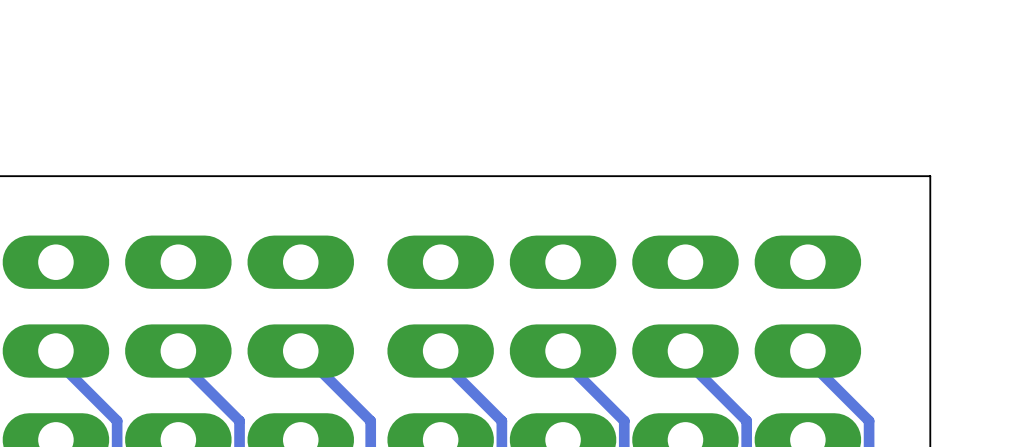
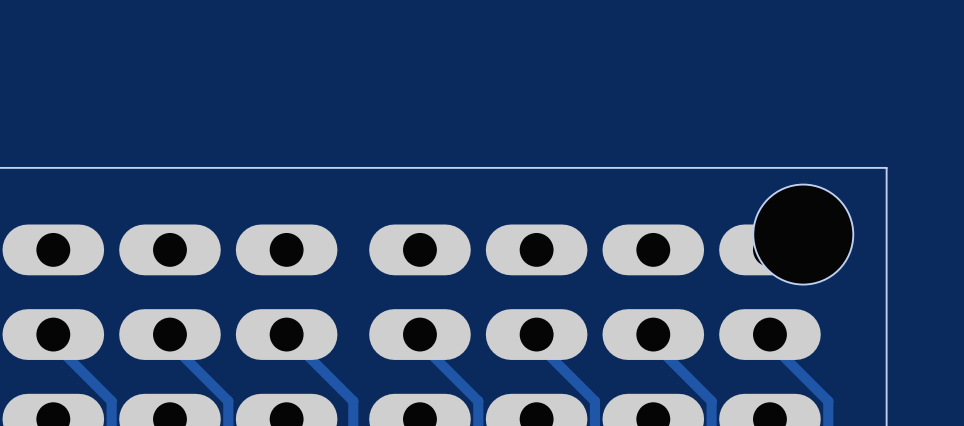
hole: none -> (803, 234)

